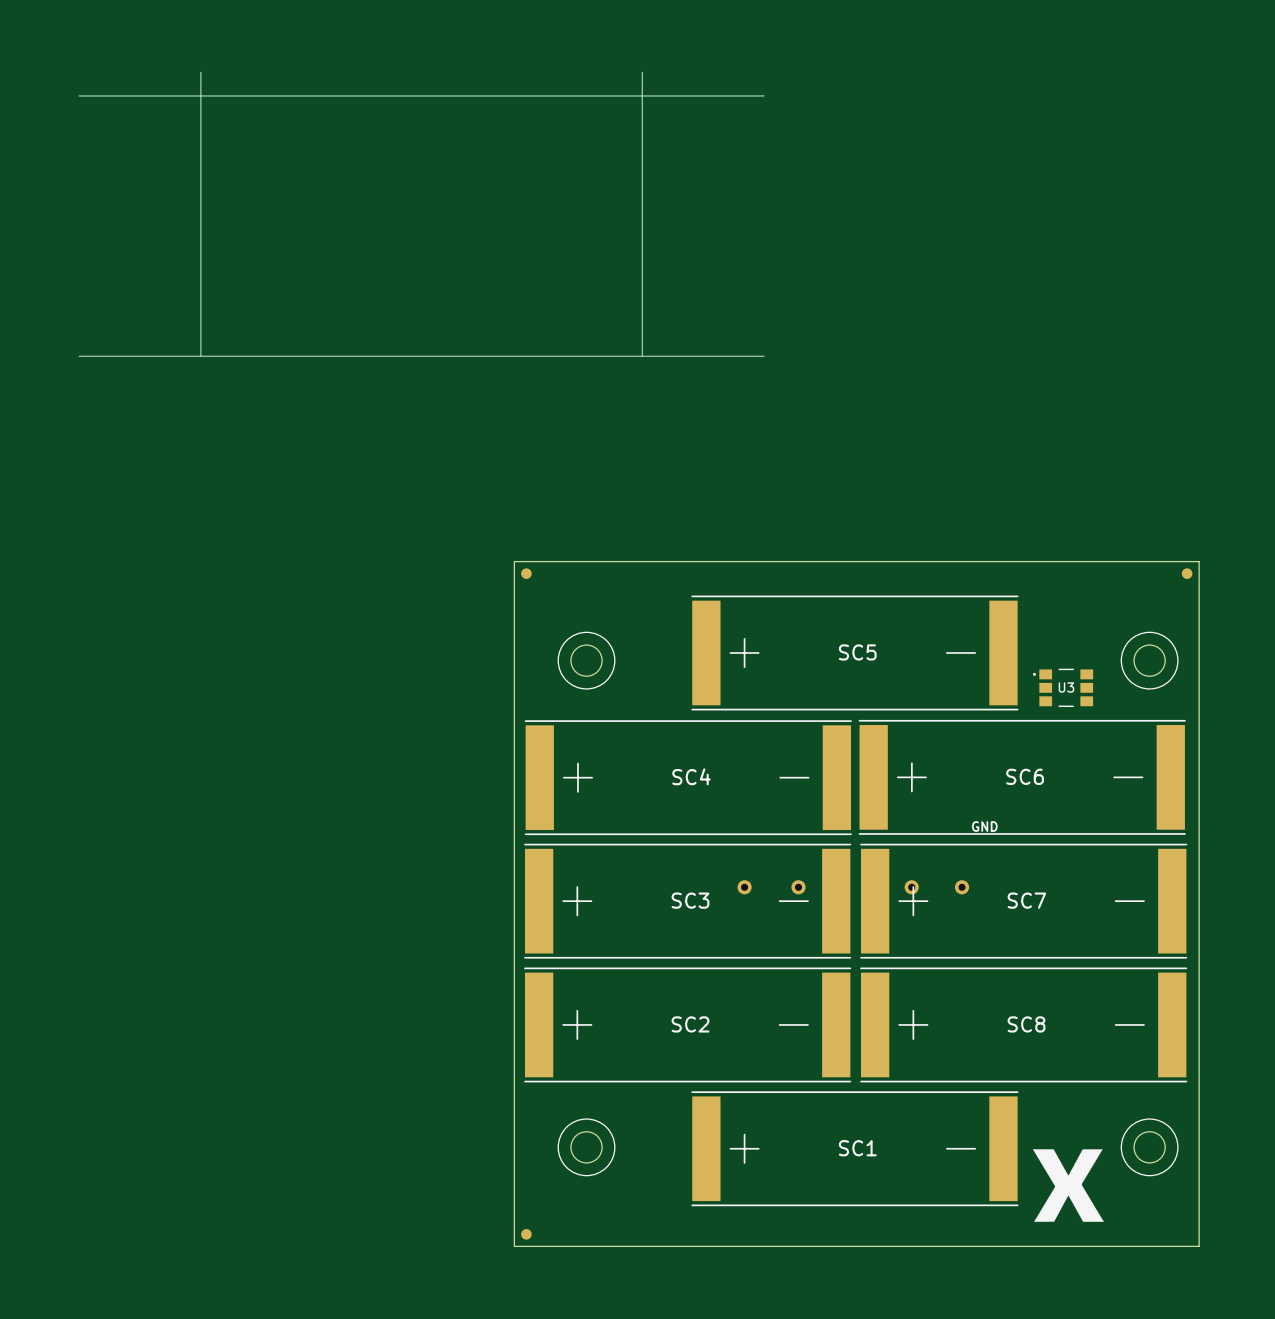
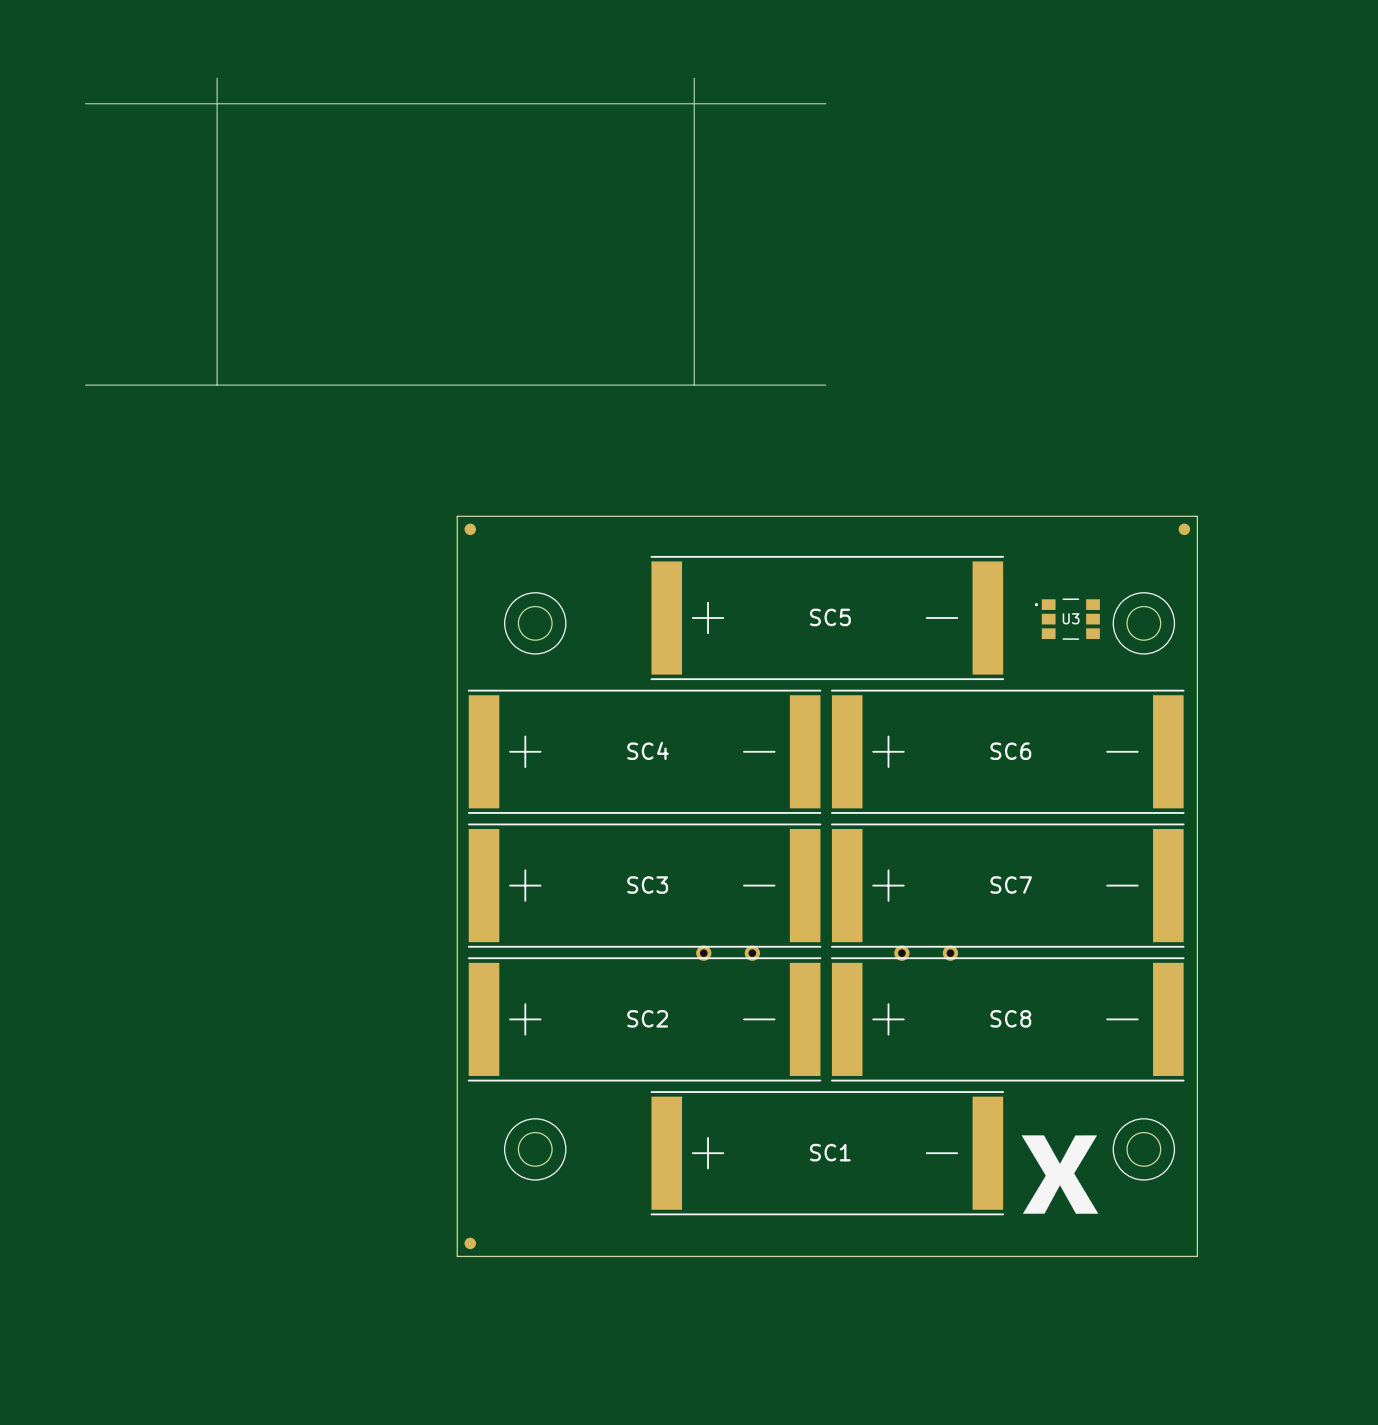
board edge: (514, 561) (514, 1246) (1199, 1246) (1199, 561) (514, 561) -> (457, 516) (457, 1256) (1197, 1256) (1197, 516) (457, 516)
part position: (526, 573) -> (470, 529)
part position: (1187, 573) -> (1184, 529)
SC5 position: (854, 652) -> (827, 618)
drawing position: (586, 660) -> (535, 623)
round board edge position: (586, 660) -> (535, 623)
drawing position: (1149, 660) -> (1143, 623)
round board edge position: (1149, 660) -> (1143, 623)
U3 position: (1063, 687) -> (1067, 619)
SC4 position: (688, 777) -> (644, 751)
SC6 position: (1022, 777) -> (1007, 751)
text: GND (984, 826) -> none
part: none -> (703, 953)
part: none -> (752, 953)
part: (744, 887) -> none
part position: (798, 887) -> (901, 953)
part position: (911, 887) -> (950, 953)
part: (962, 887) -> none
SC3 position: (687, 901) -> (644, 885)
SC7 position: (1023, 901) -> (1007, 885)
SC2 position: (687, 1024) -> (644, 1019)
SC8 position: (1023, 1024) -> (1007, 1019)
drawing position: (586, 1147) -> (535, 1149)
round board edge position: (586, 1147) -> (535, 1149)
drawing position: (1149, 1147) -> (1143, 1149)
round board edge position: (1149, 1147) -> (1143, 1149)
SC1 position: (854, 1148) -> (827, 1153)
drawing position: (1068, 1185) -> (1059, 1174)
part position: (526, 1234) -> (470, 1243)

